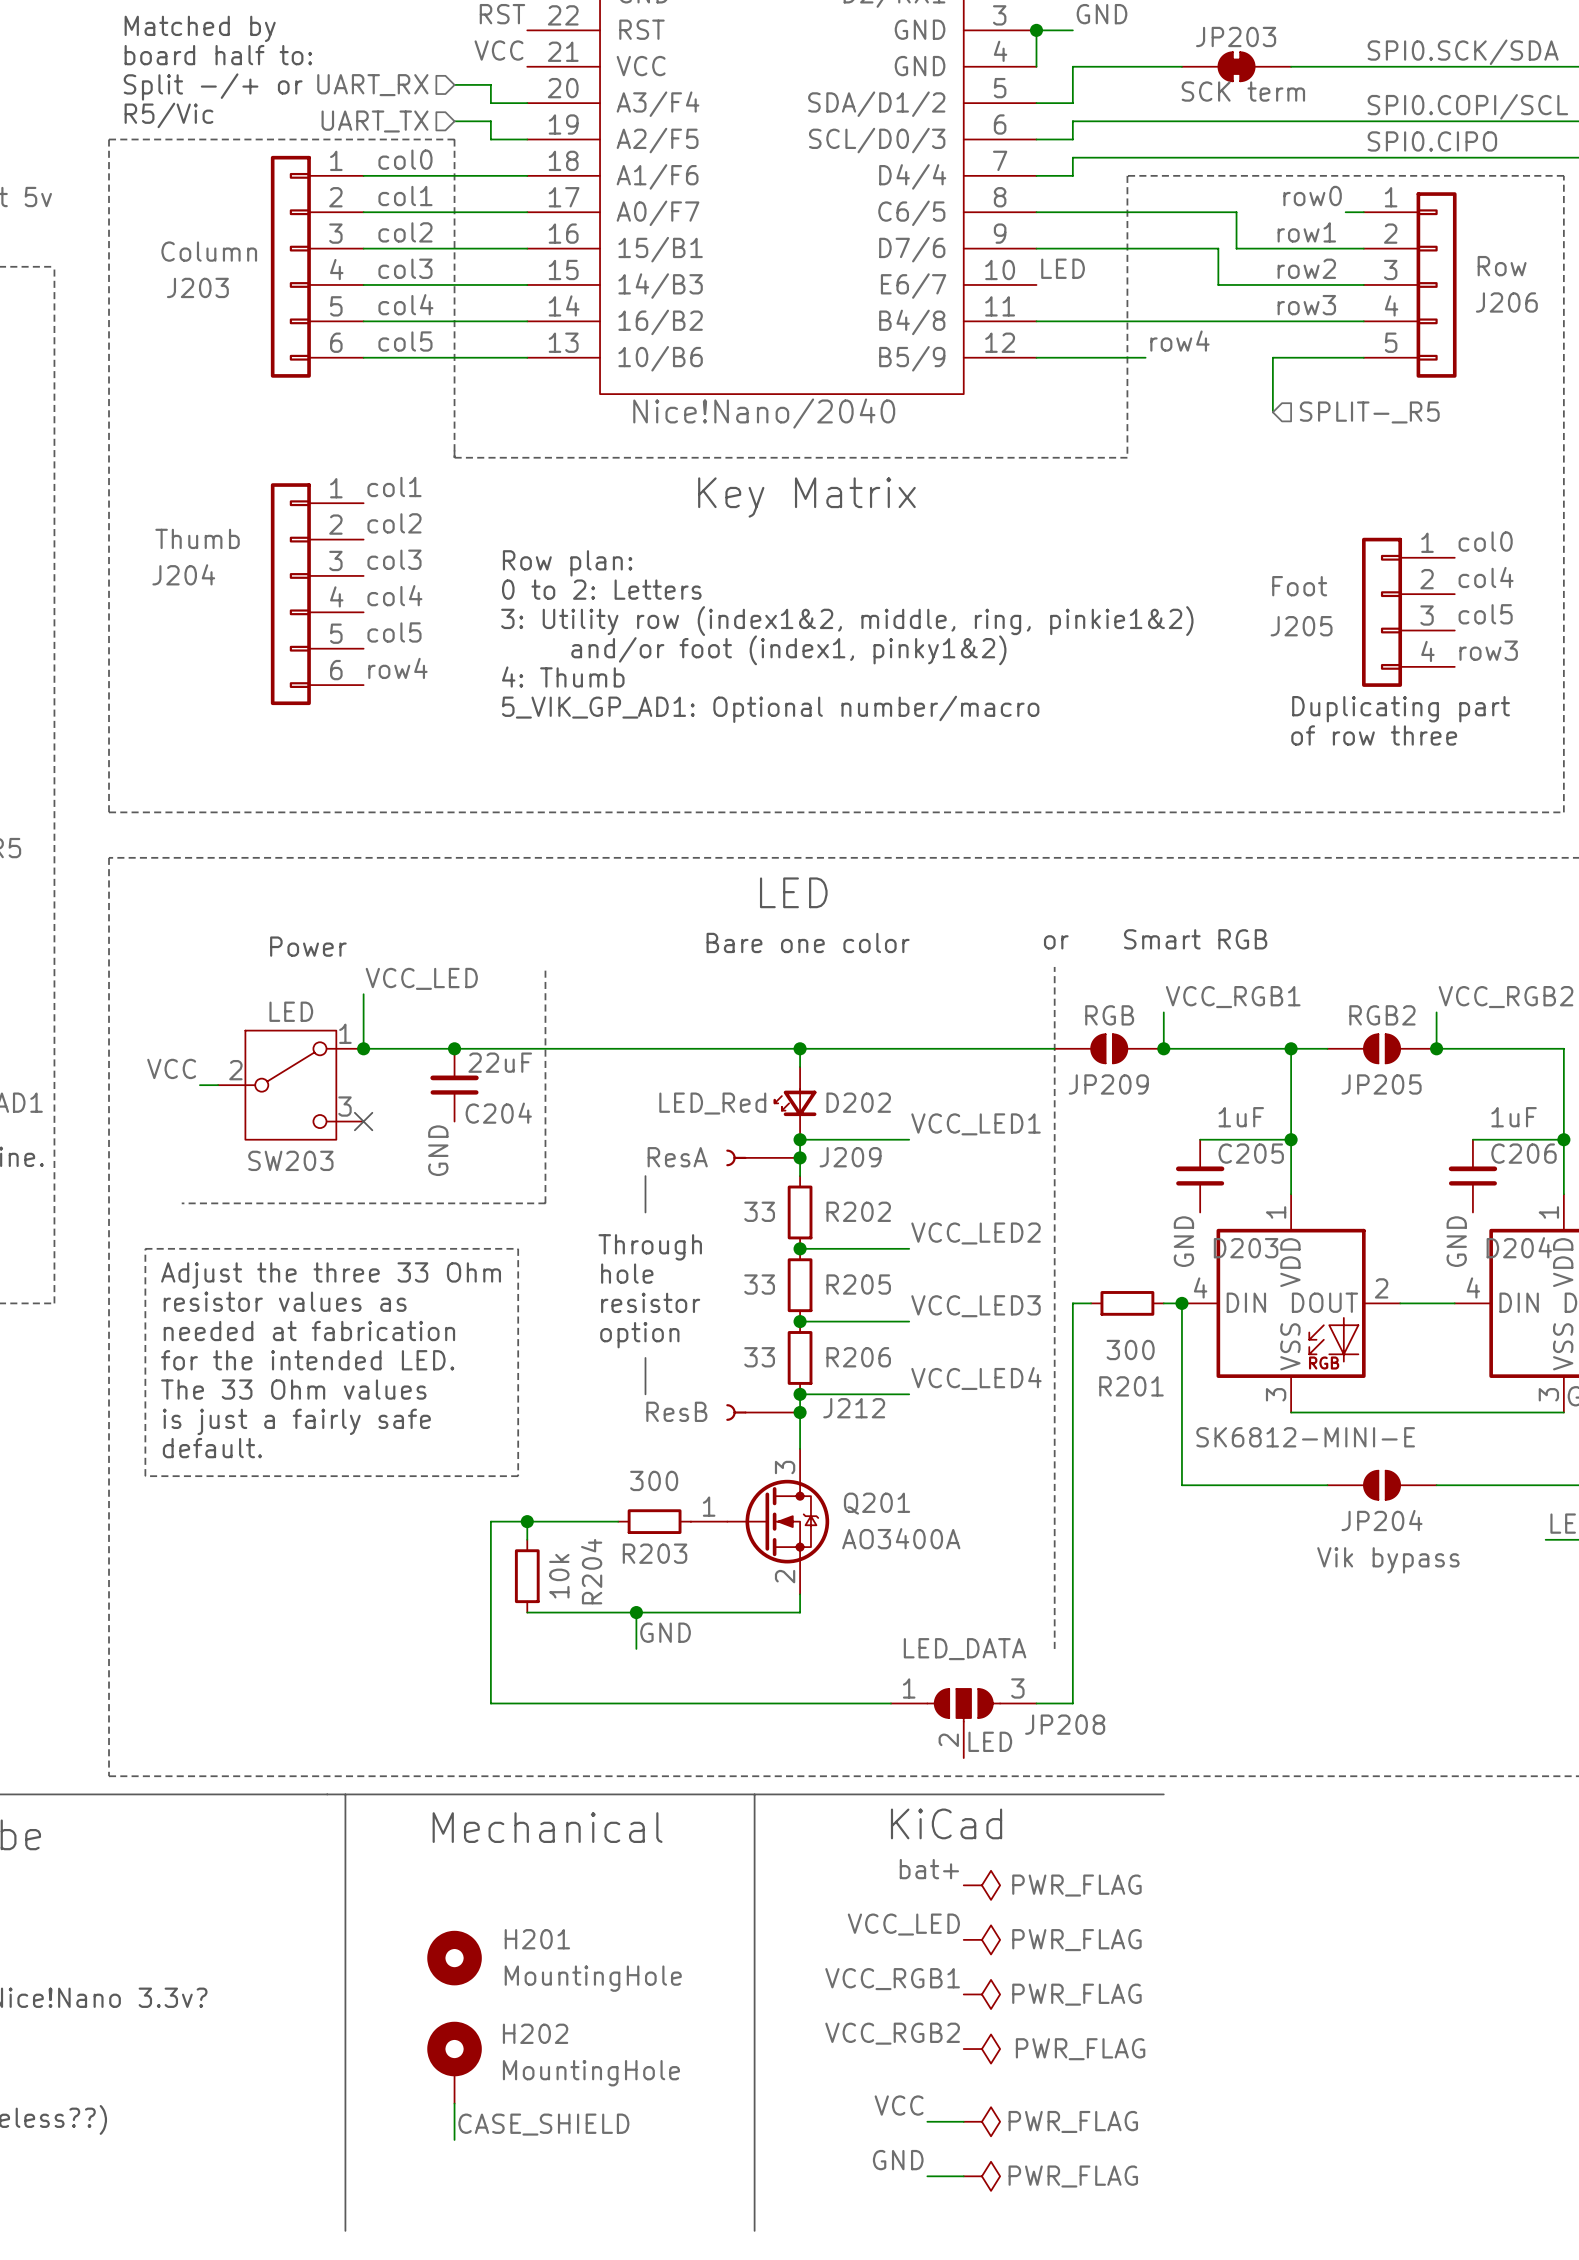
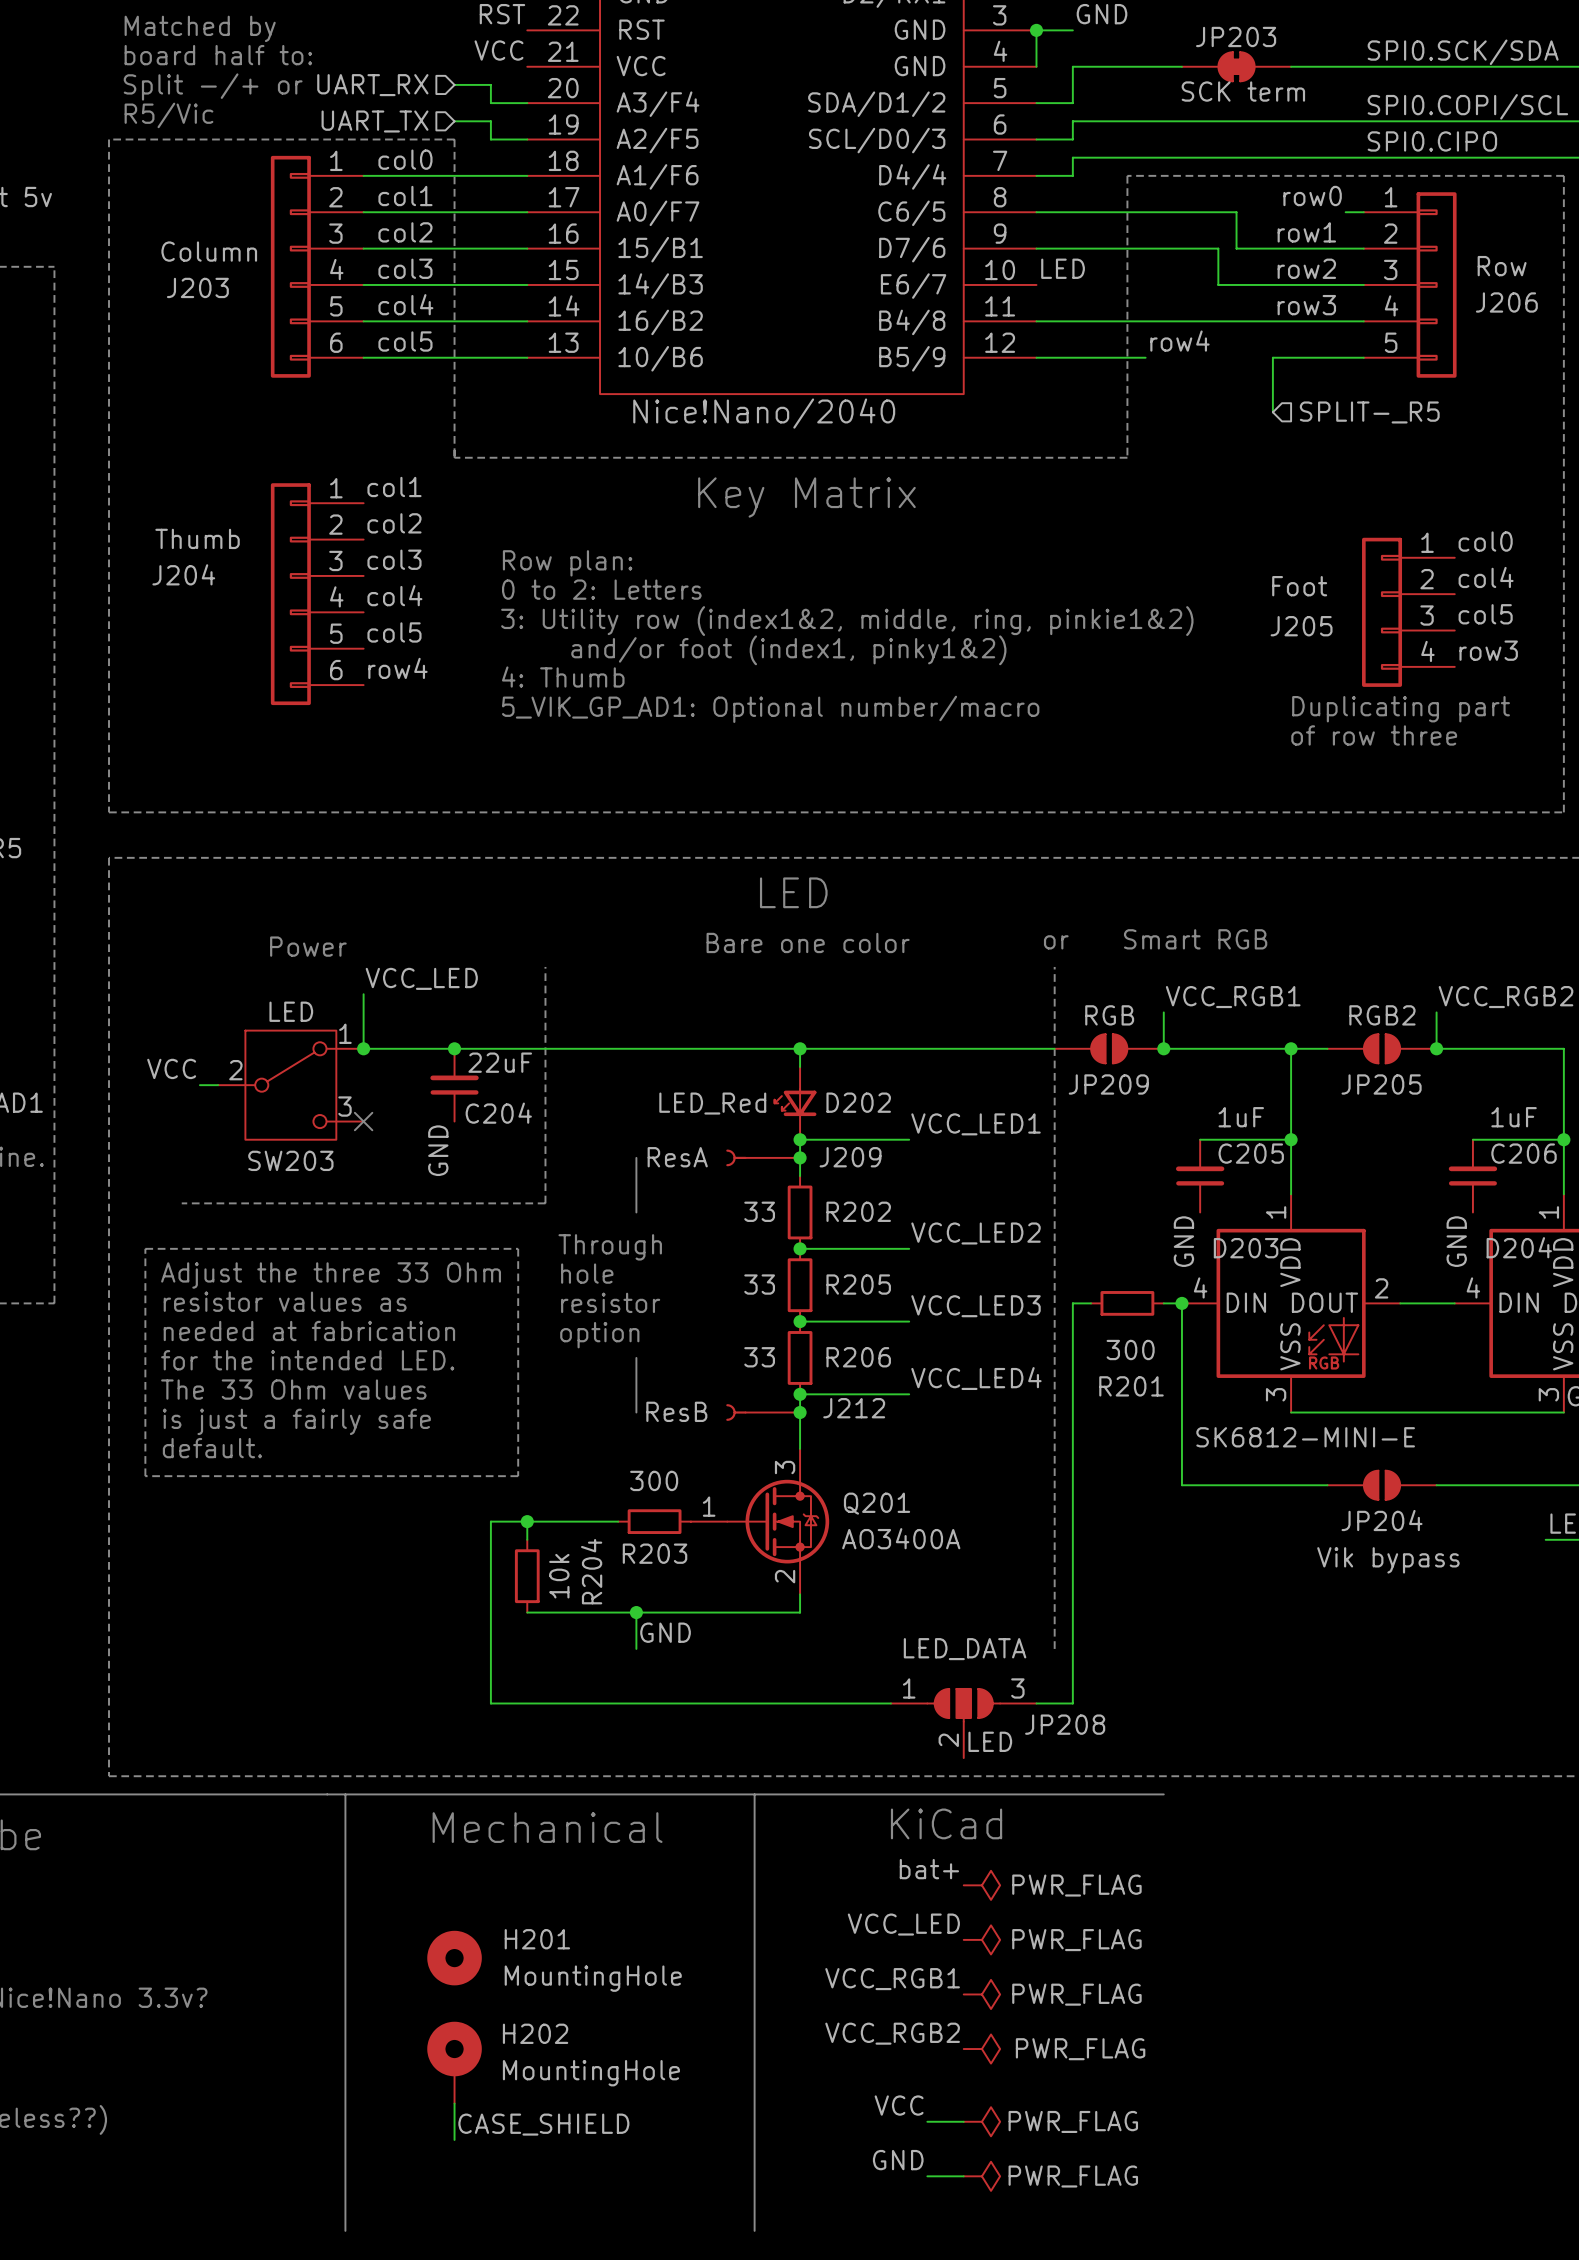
line: none -> (636, 1157) (636, 1212)
line: (645, 1176) (645, 1212) -> none
text position: Through (650, 1247) -> Through (610, 1247)
text position: hole (627, 1273) -> hole (587, 1273)
text position: resistor (650, 1302) -> resistor (610, 1302)
text position: option (639, 1335) -> option (599, 1335)
line: none -> (636, 1357) (636, 1412)
line: (645, 1357) (645, 1394) -> none

